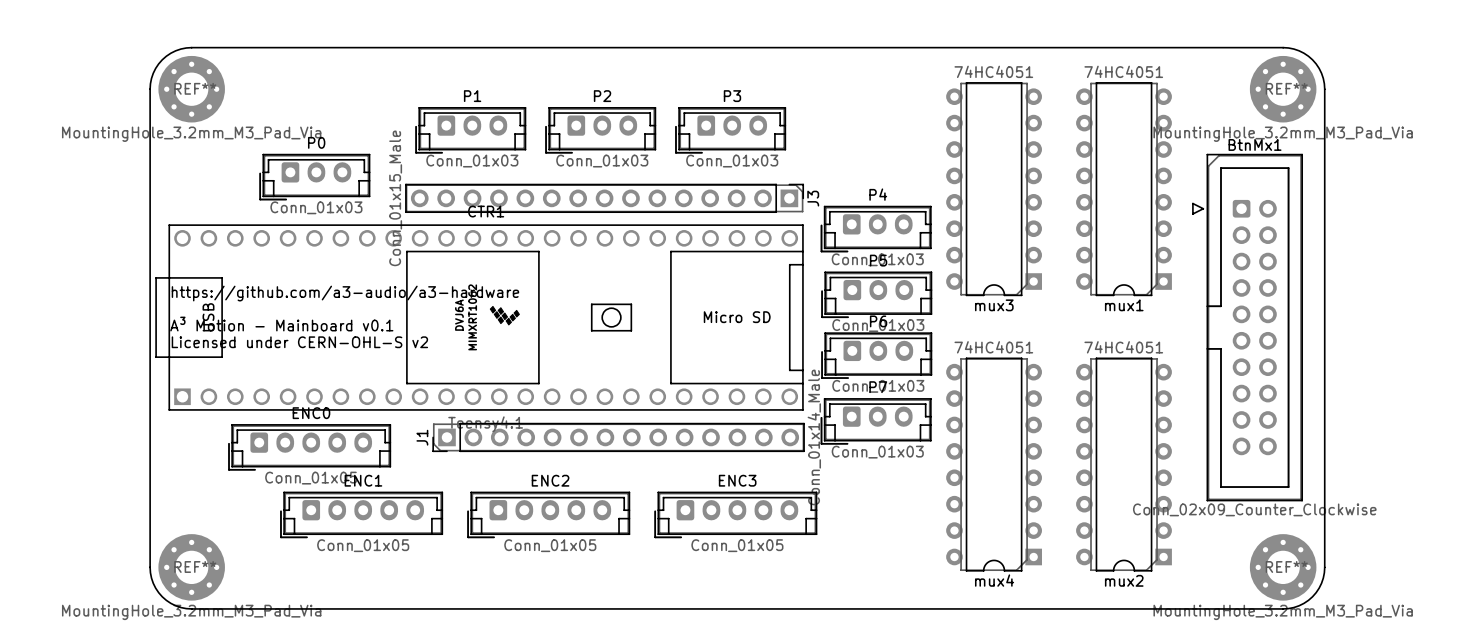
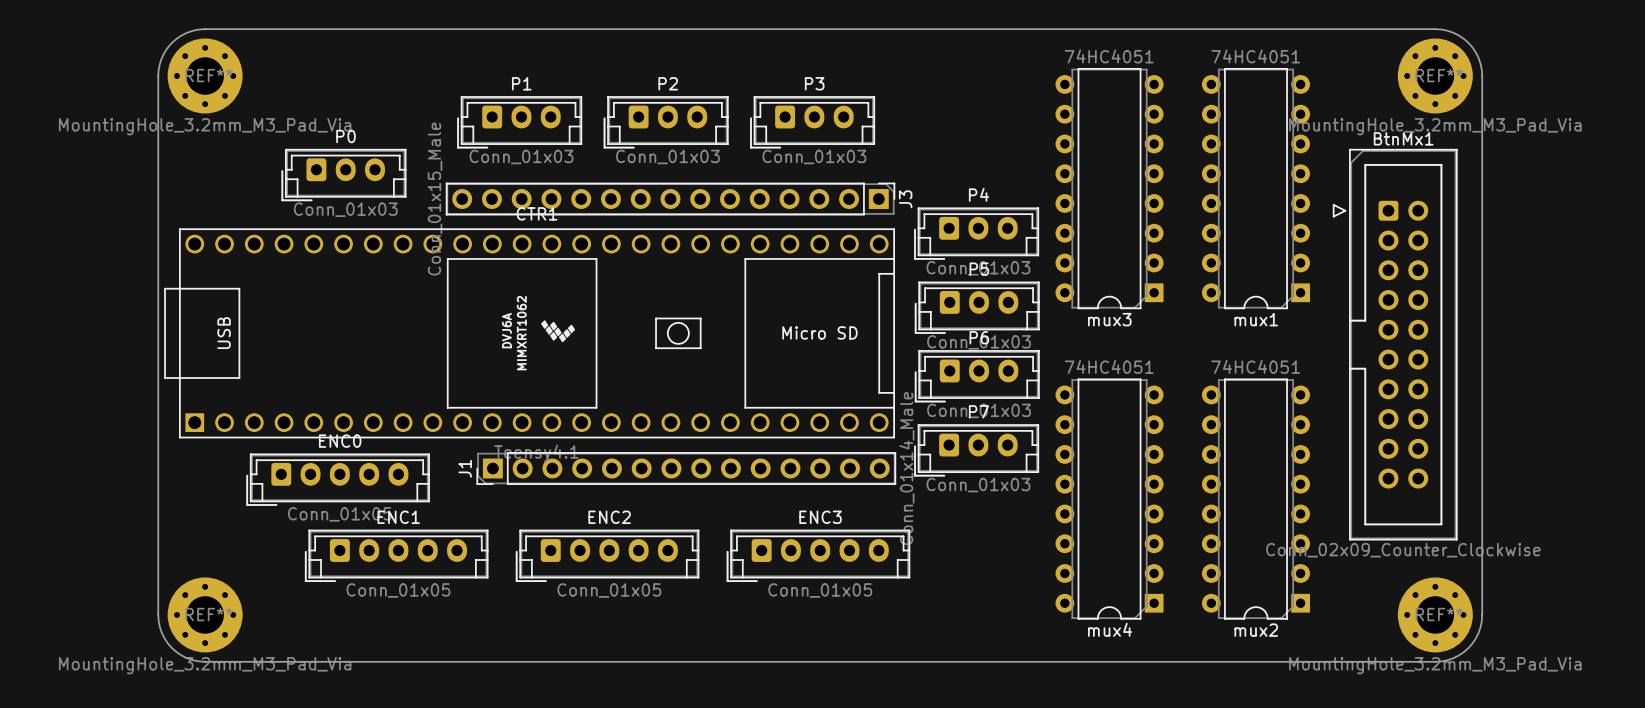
text: https://github.com/a3-audio/a3-hardware (345, 293) -> none
text: A³ Motion - Mainboard v0.1 (281, 324) -> none
text: Licensed under CERN-OHL-S v2 (299, 342) -> none

